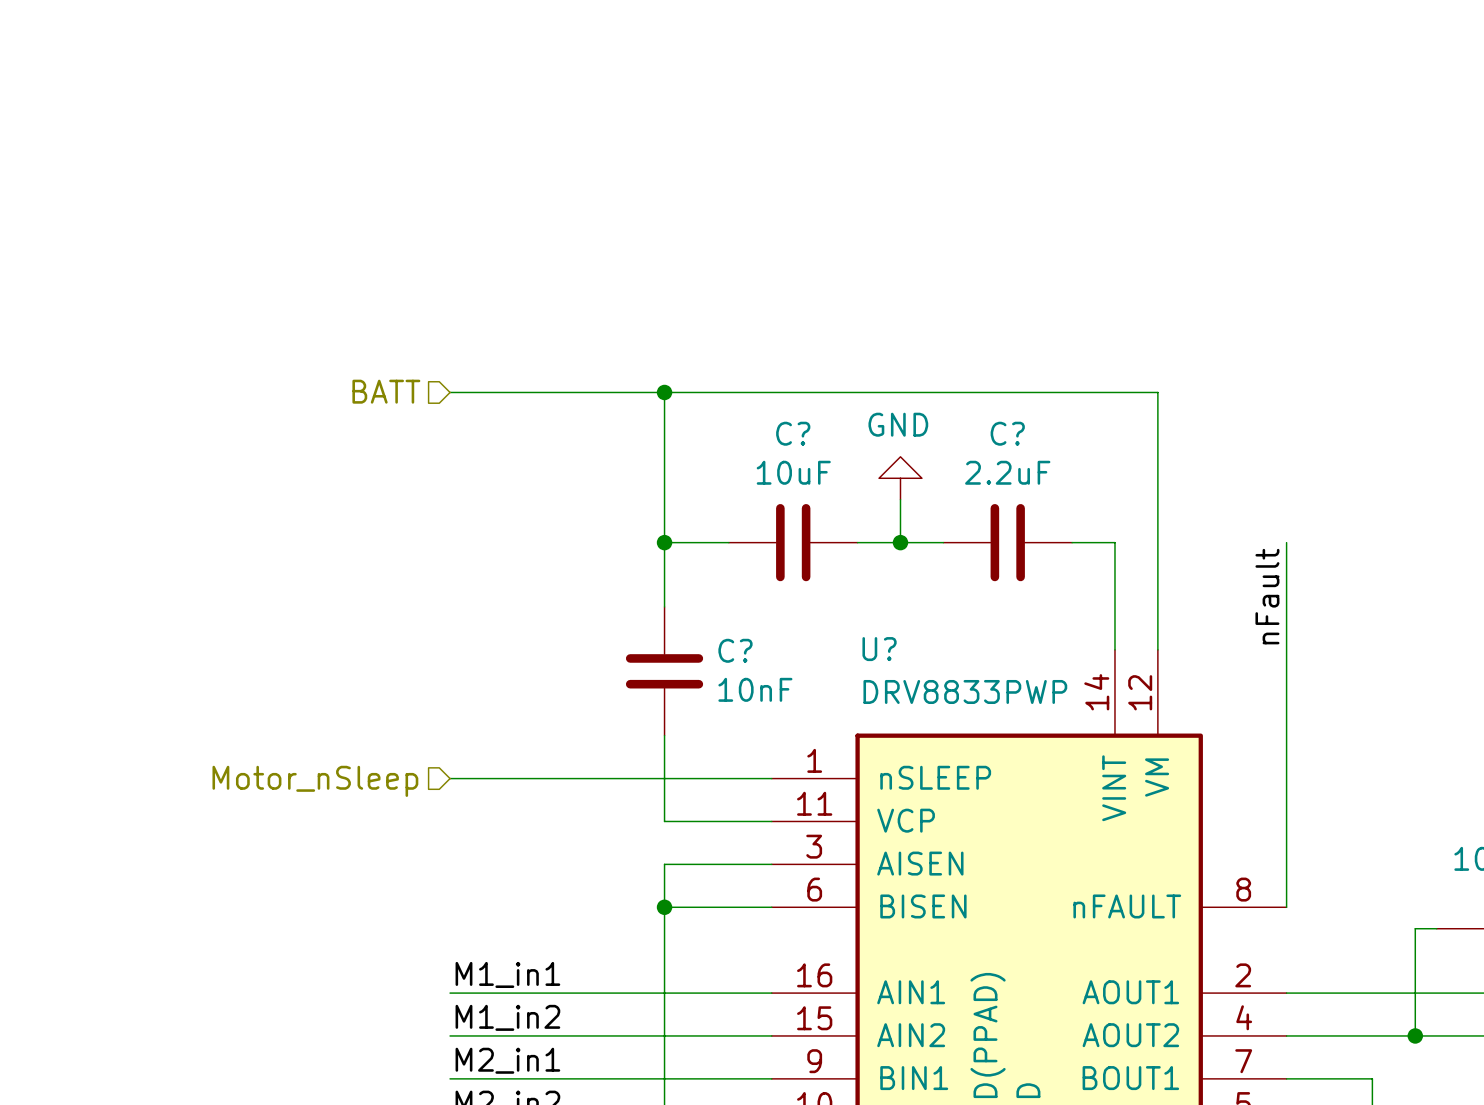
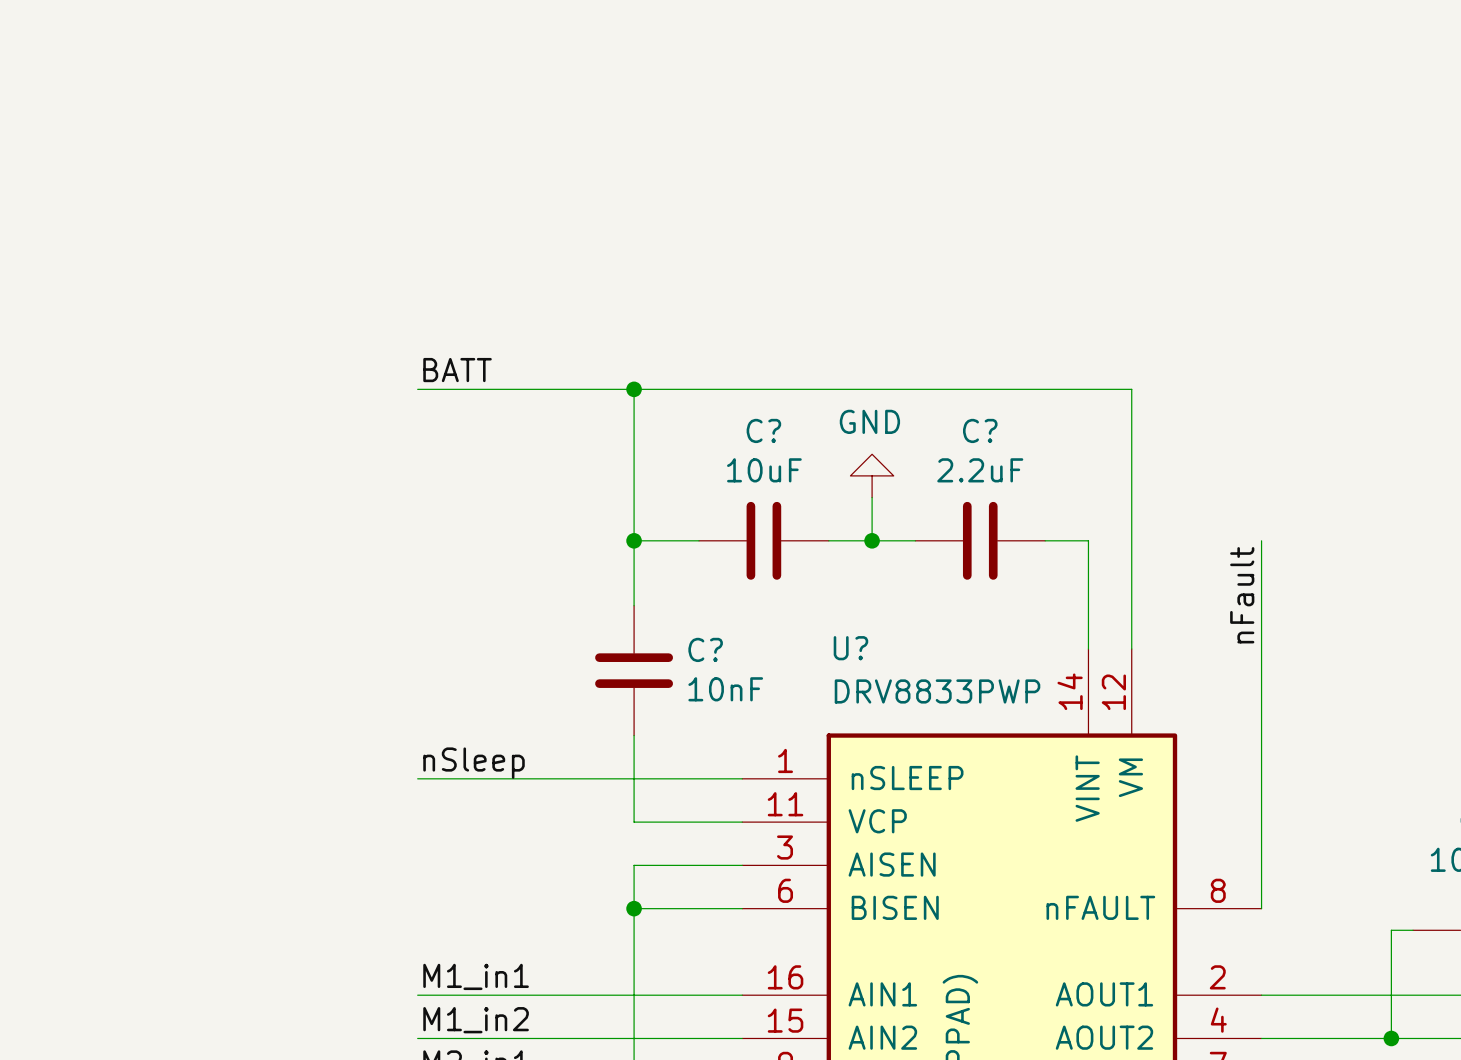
label: none -> BATT (457, 370)
hierarchical label: BATT (386, 391) -> none
label: none -> nSleep (474, 763)
hierarchical label: Motor_nSleep (315, 781) -> none

